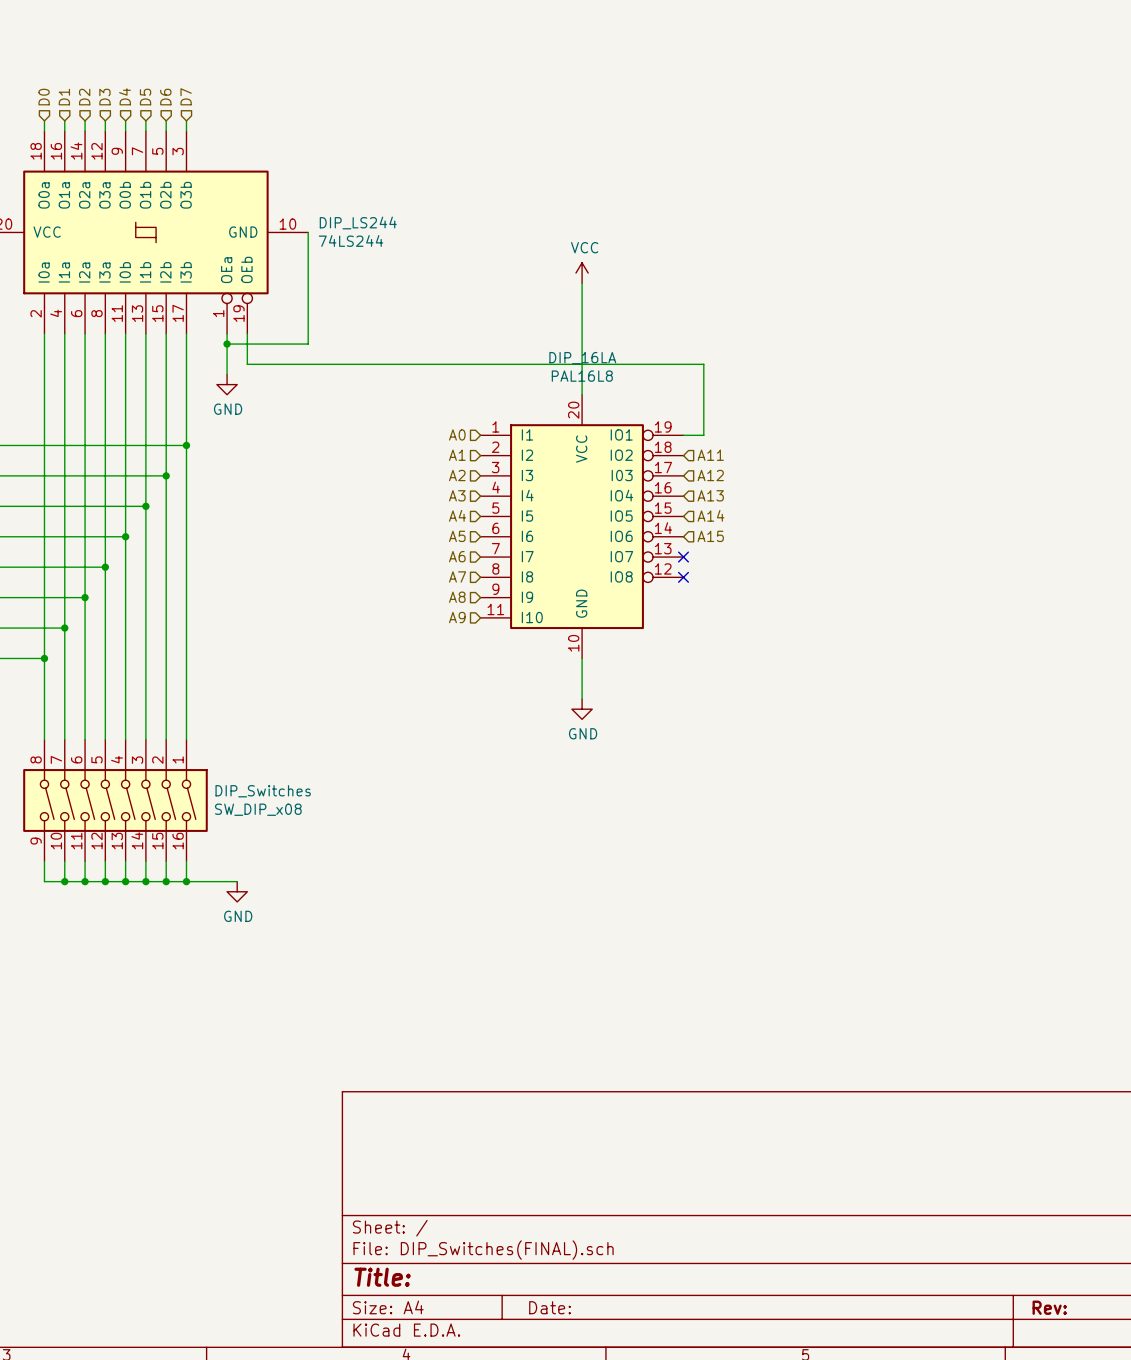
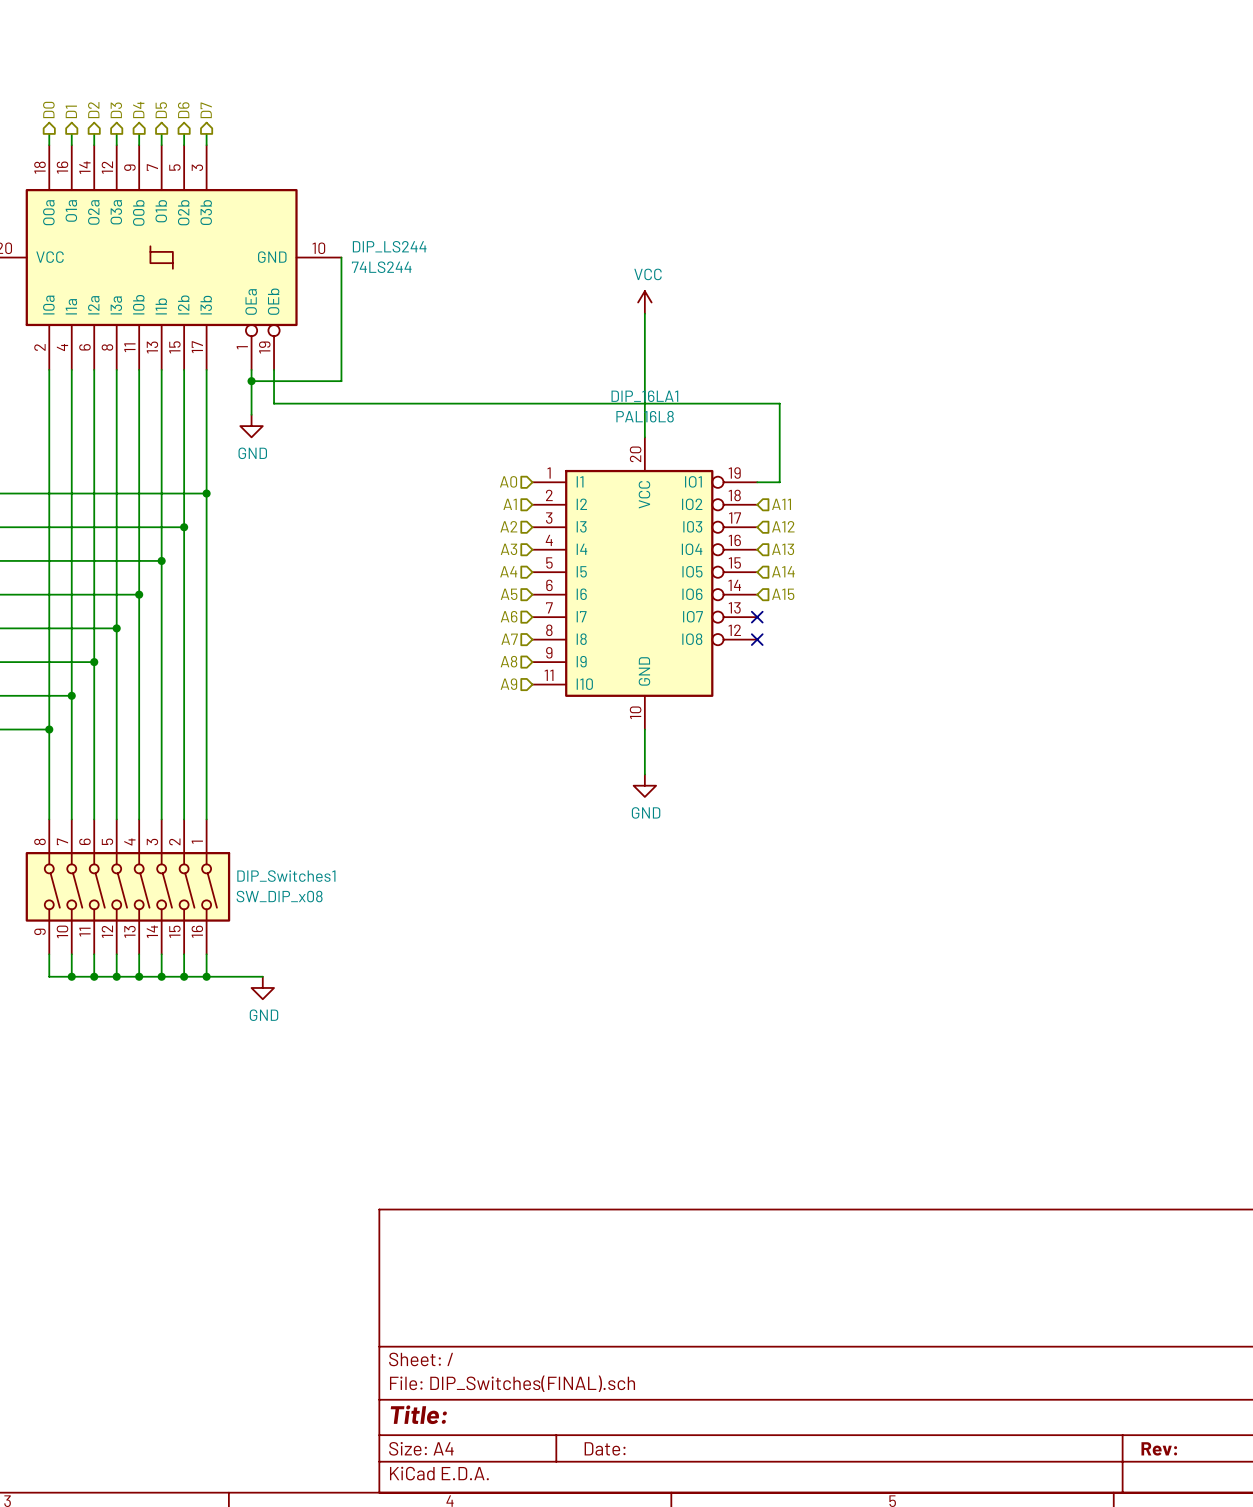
hierarchical label shape: input (125, 96) -> output (138, 110)
hierarchical label shape: input (186, 96) -> output (206, 110)
hierarchical label shape: input (44, 97) -> output (48, 109)
hierarchical label shape: input (64, 97) -> output (71, 111)
hierarchical label shape: input (84, 97) -> output (93, 110)
hierarchical label shape: input (104, 97) -> output (116, 110)
hierarchical label shape: input (145, 97) -> output (161, 110)
hierarchical label shape: input (165, 97) -> output (183, 110)
DIP_16LA name: DIP_16LA (582, 358) -> DIP_16LA1 (644, 396)
DIP_Switches name: DIP_Switches (263, 791) -> DIP_Switches1 (286, 876)

